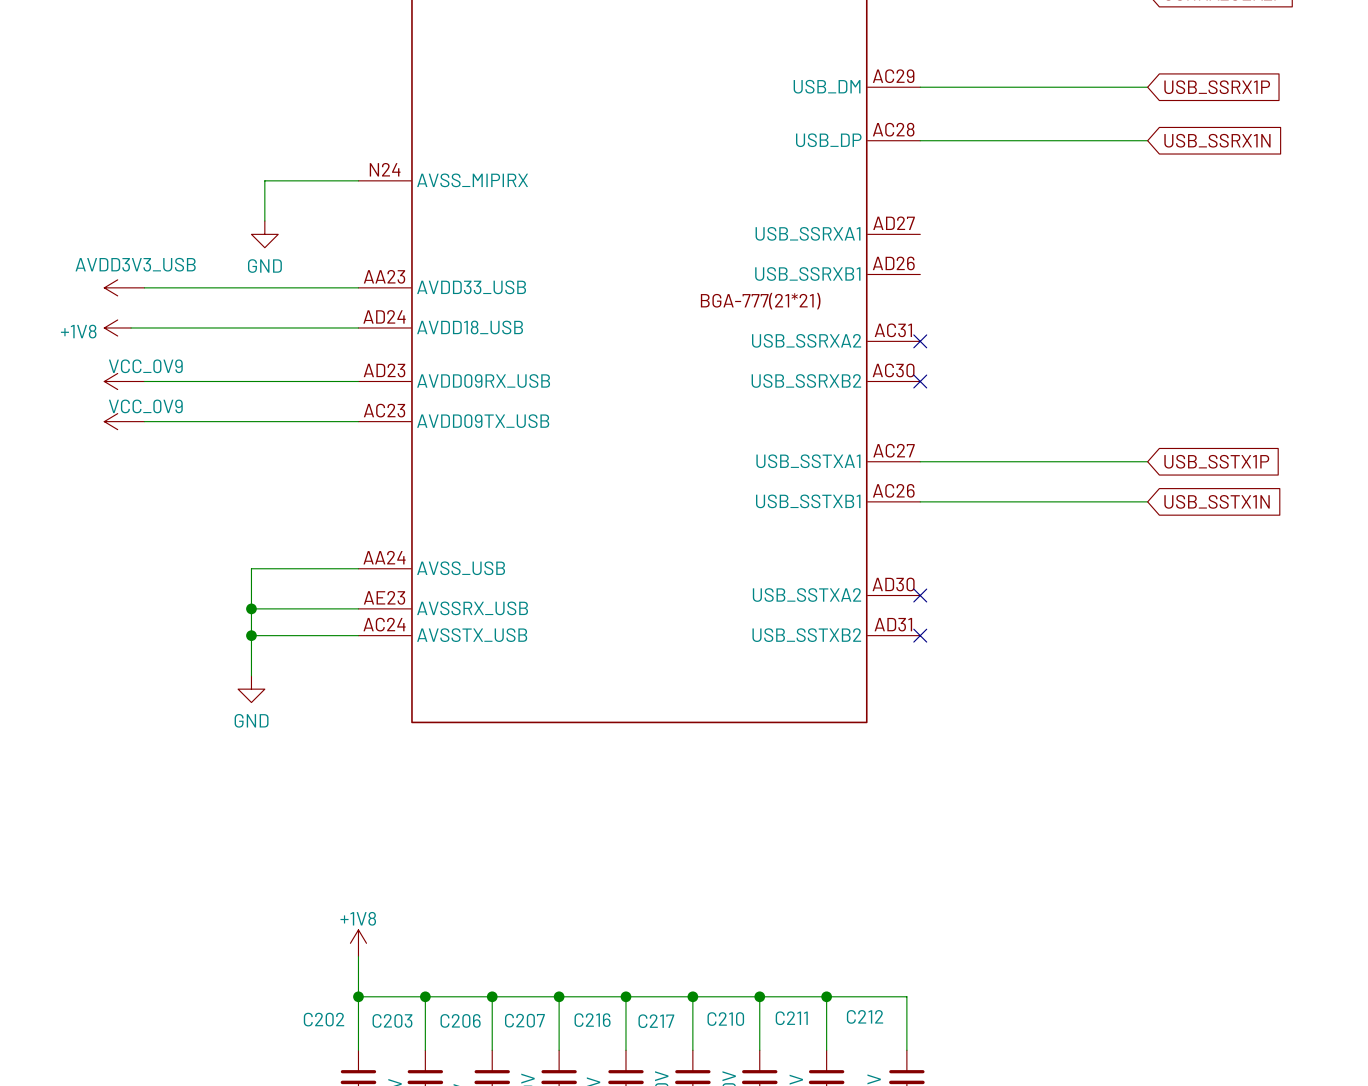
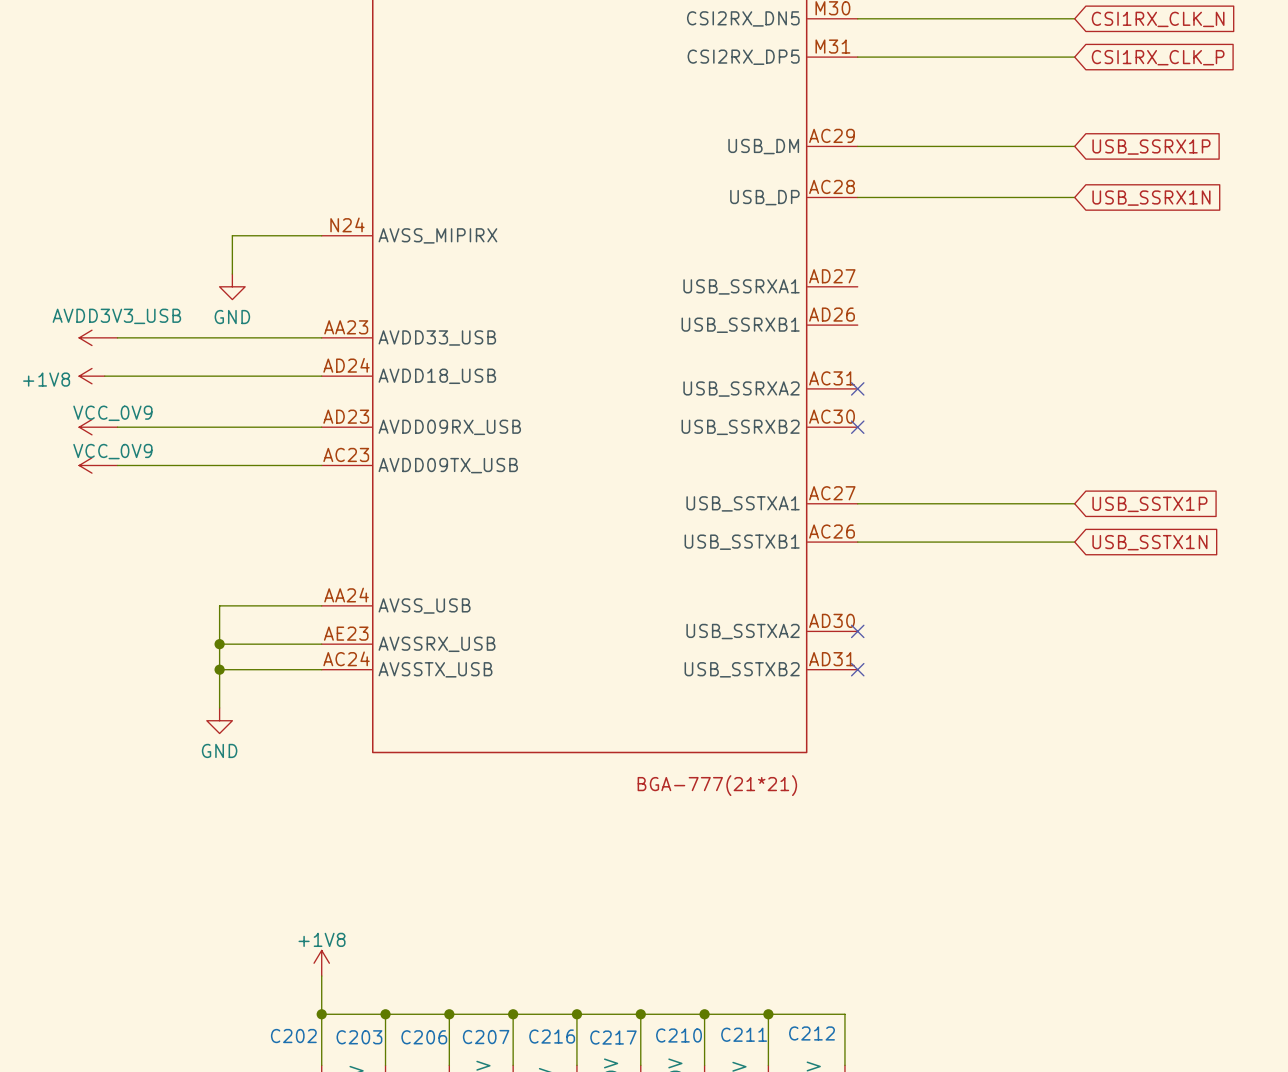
part text position: BGA-777(21*21) (760, 301) -> BGA-777(21*21) (717, 785)

